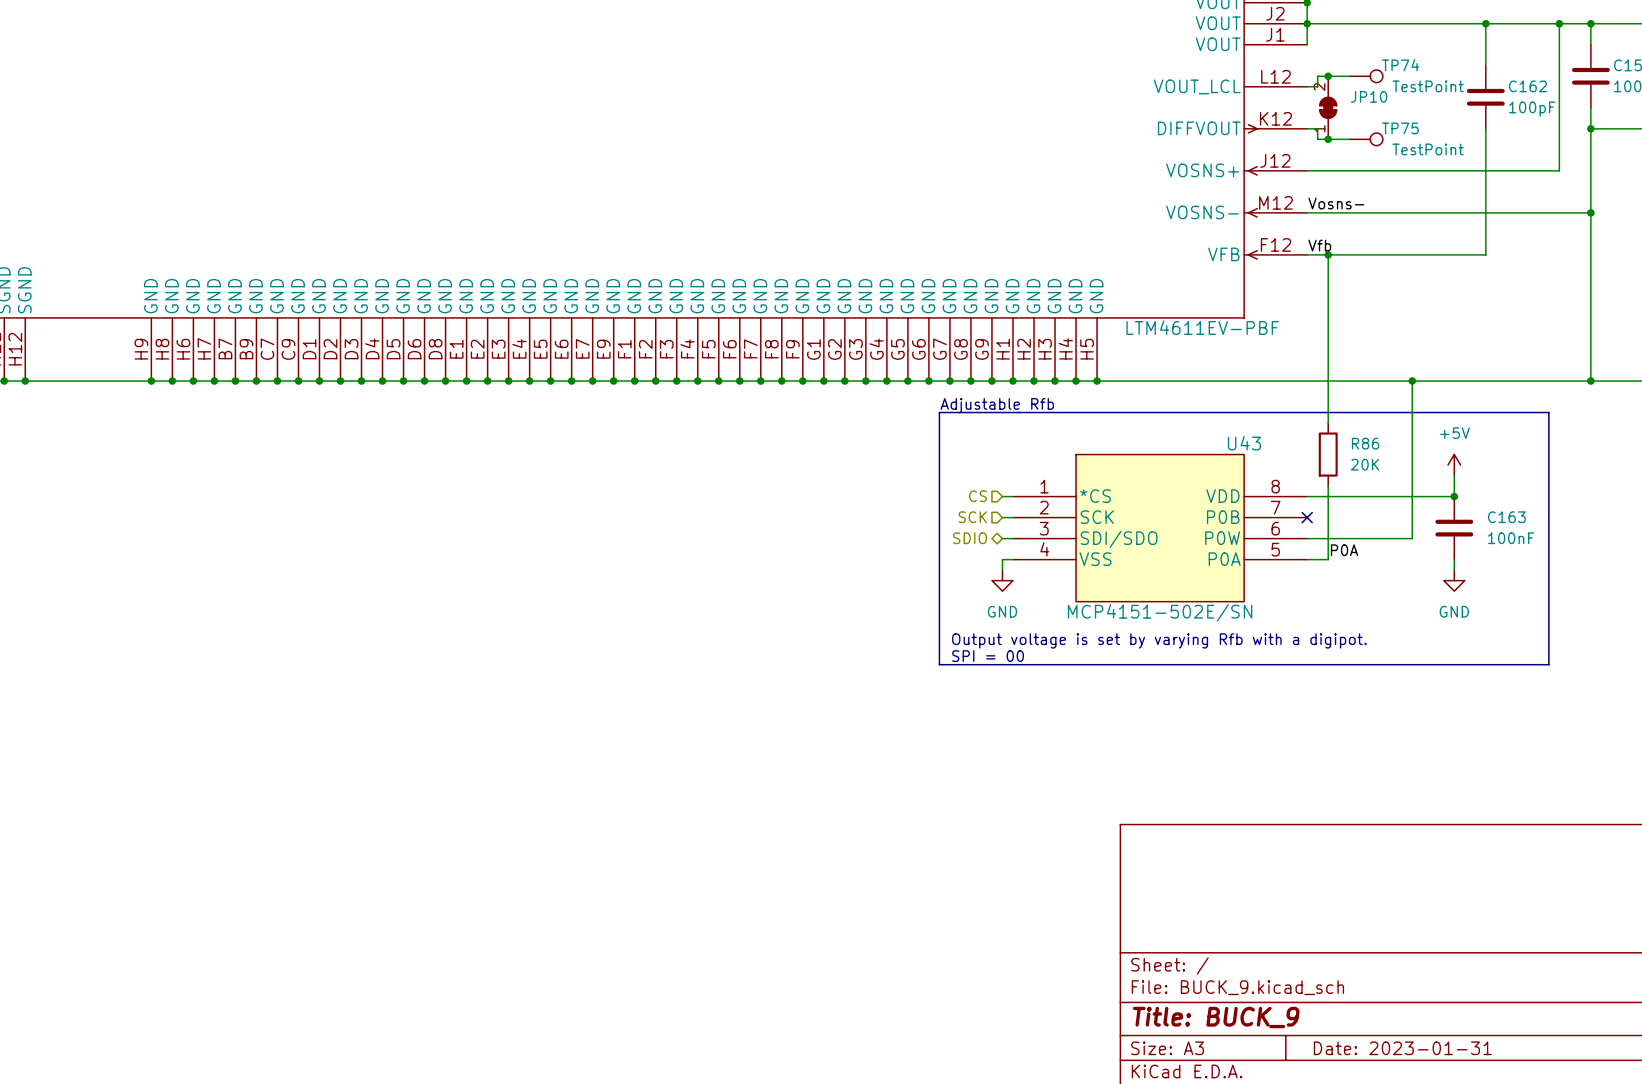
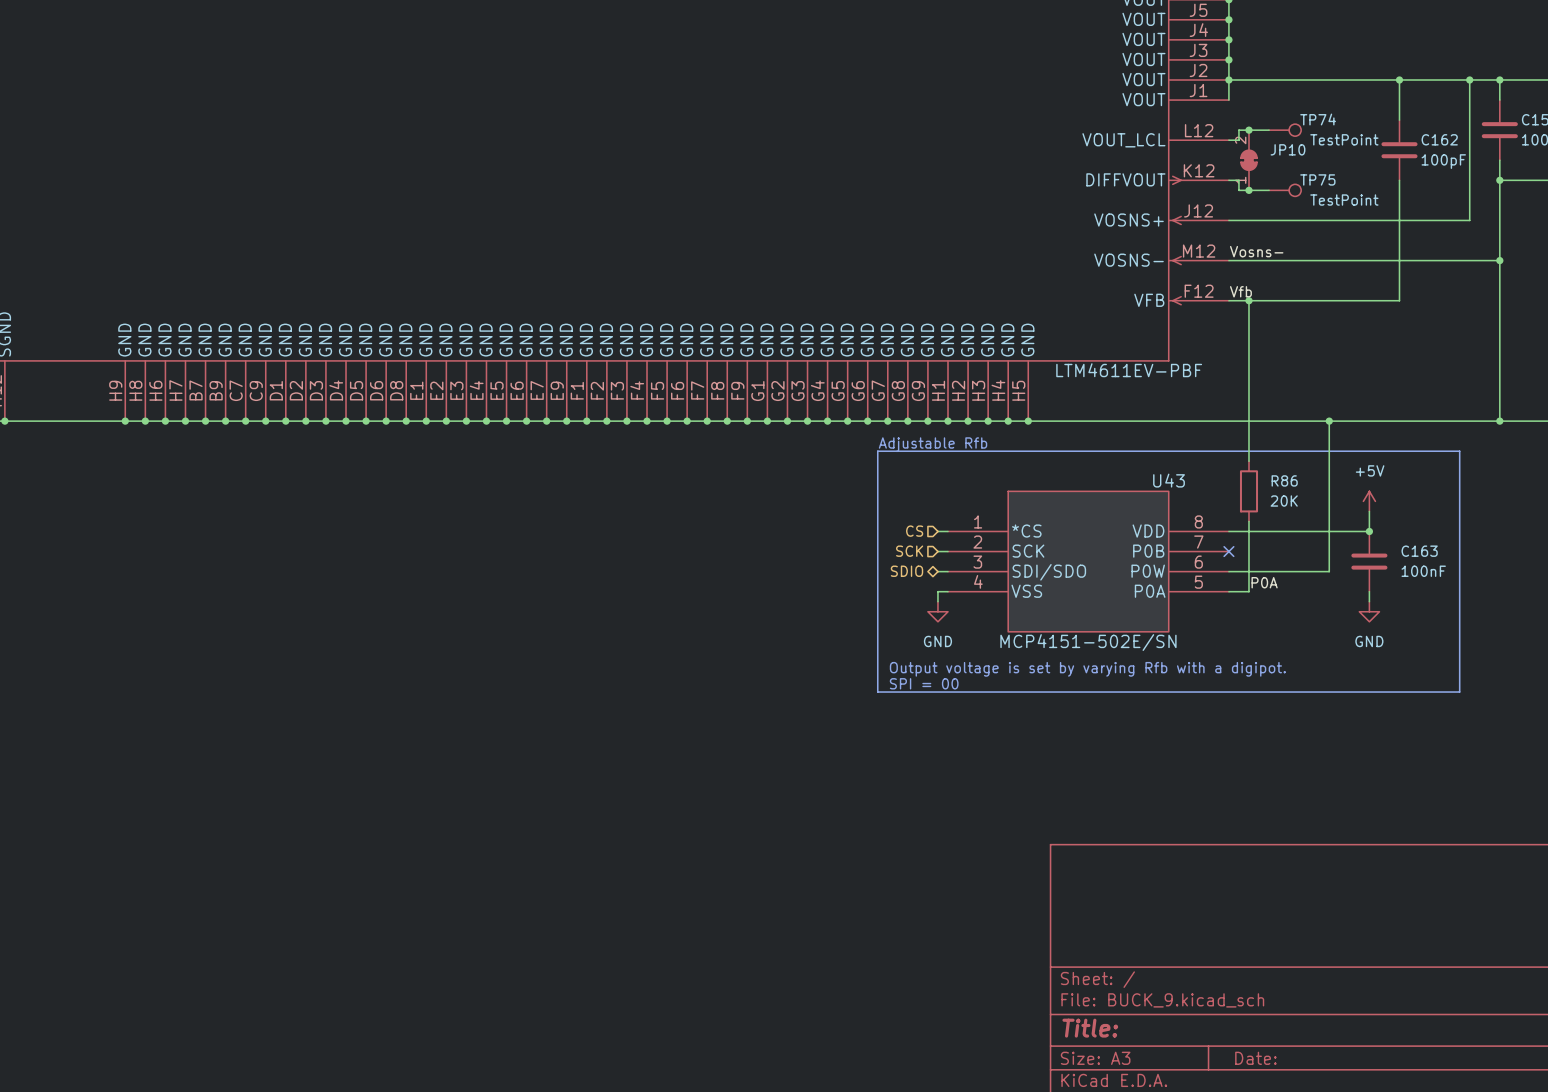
title block: Title: BUCK_9 (1216, 1017) -> Title: (1090, 1028)
title block: Date: 2023-01-31 (1402, 1048) -> Date: (1255, 1058)

